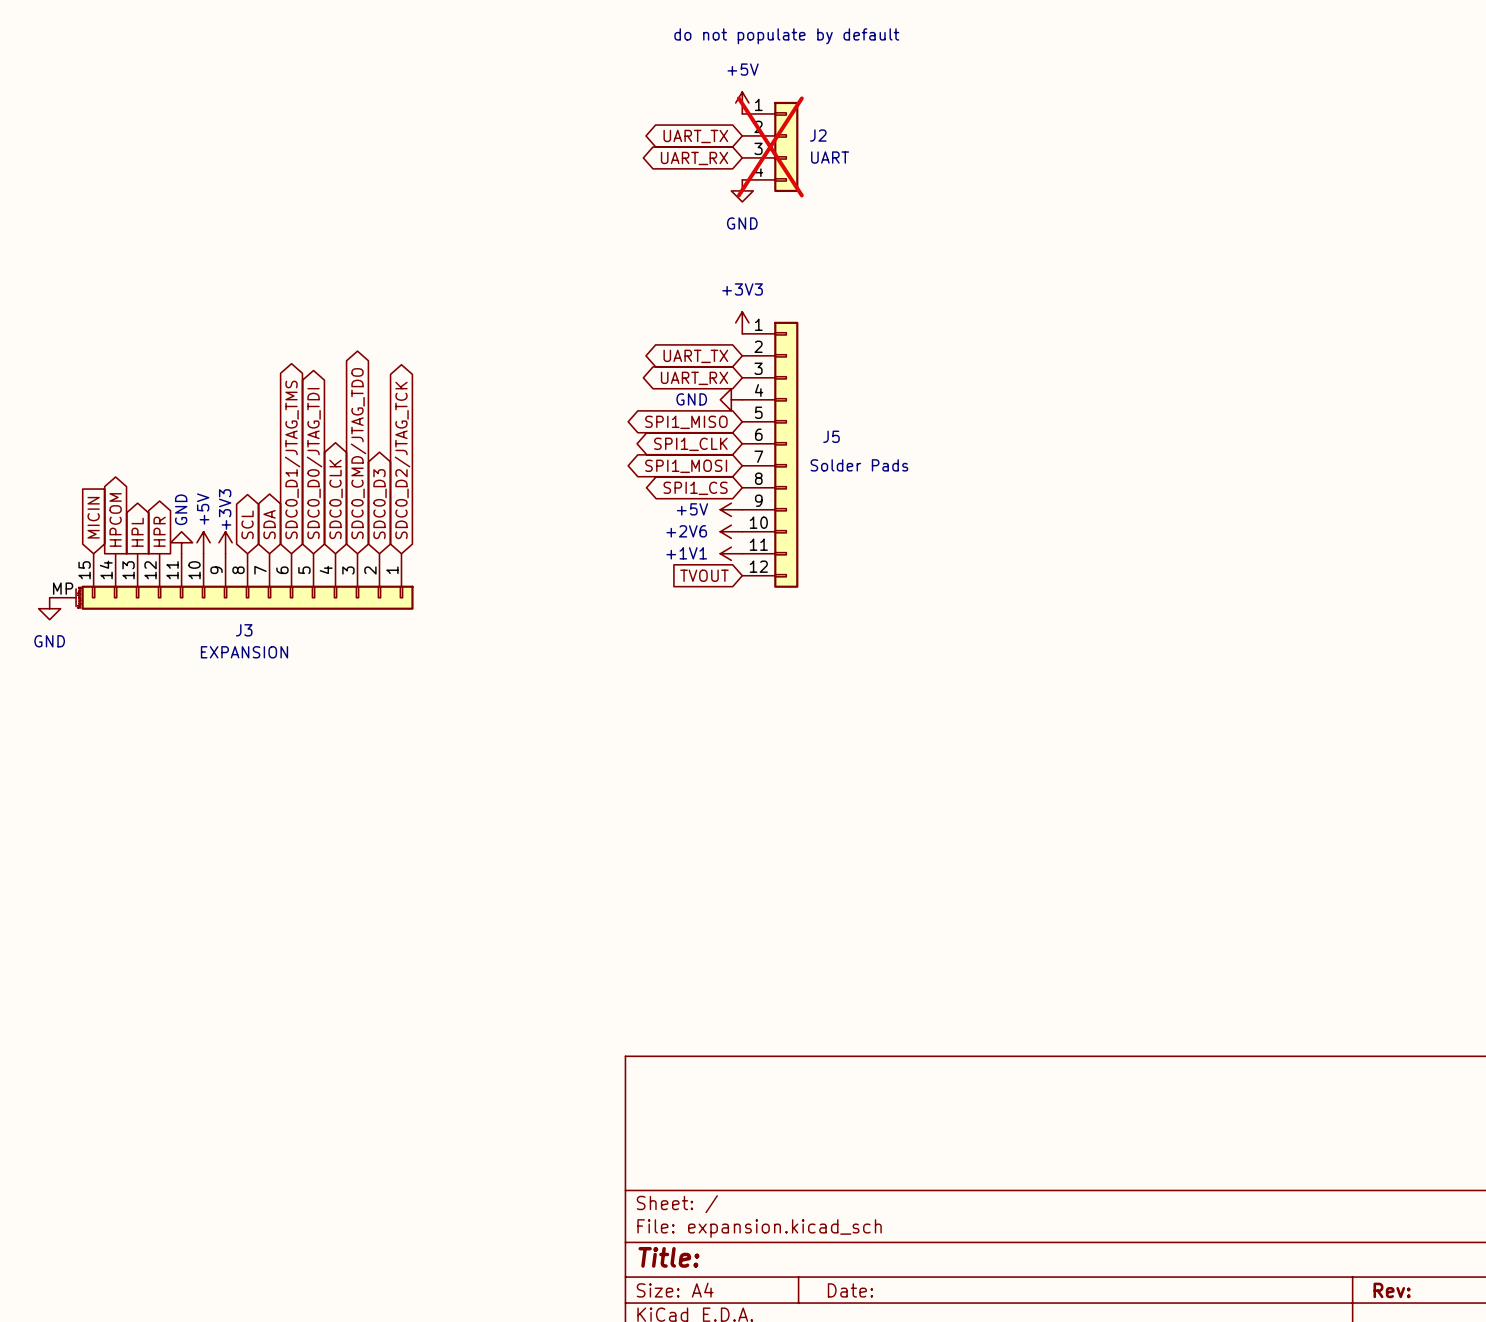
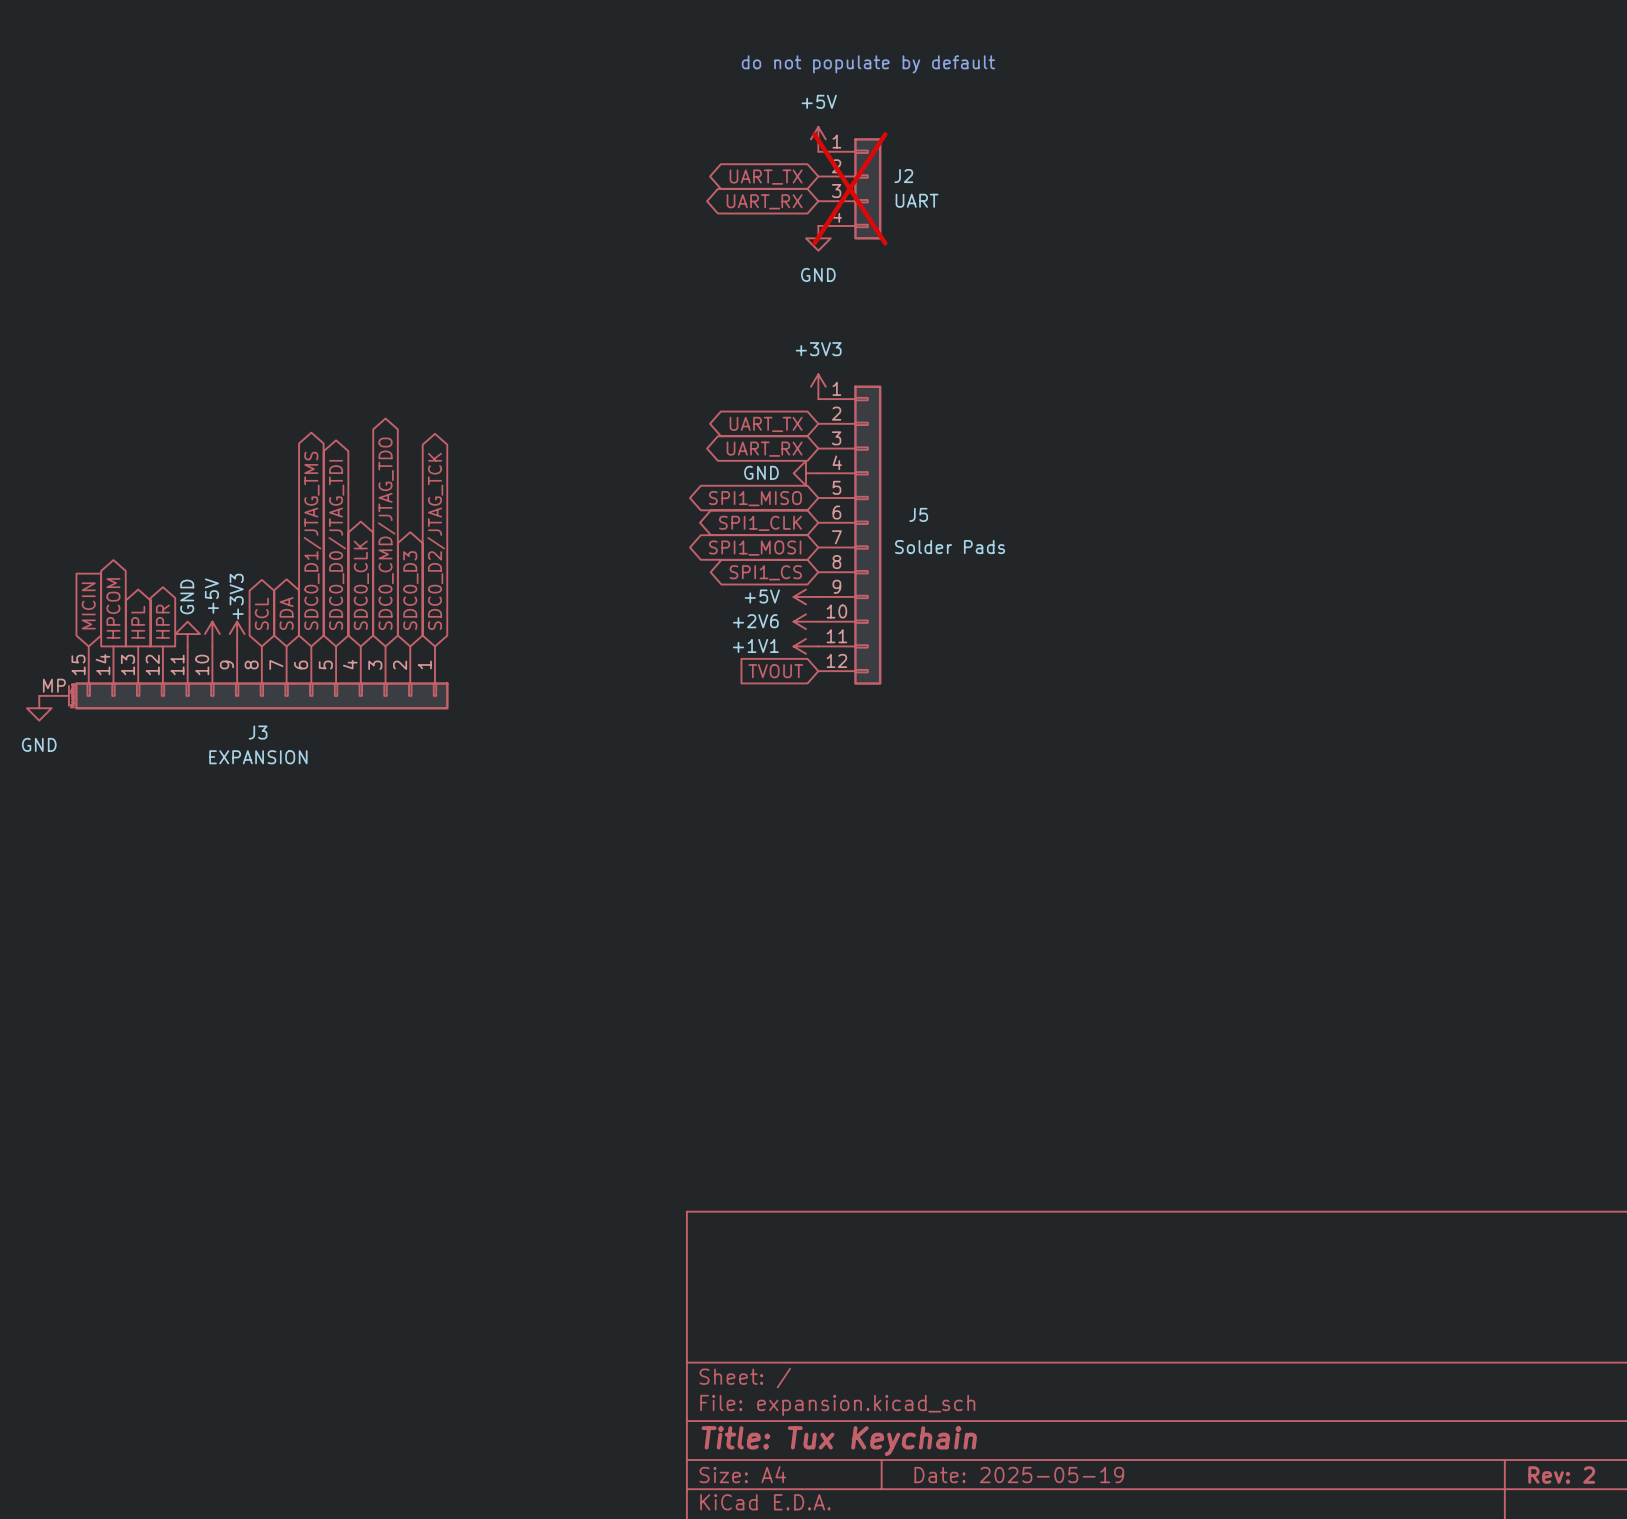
title block: Title: (669, 1257) -> Title: Tux Keychain (839, 1441)
title block: Date: (850, 1290) -> Date: 2025-05-19 (1019, 1475)
title block: Rev: (1392, 1290) -> Rev: 2 (1561, 1475)

